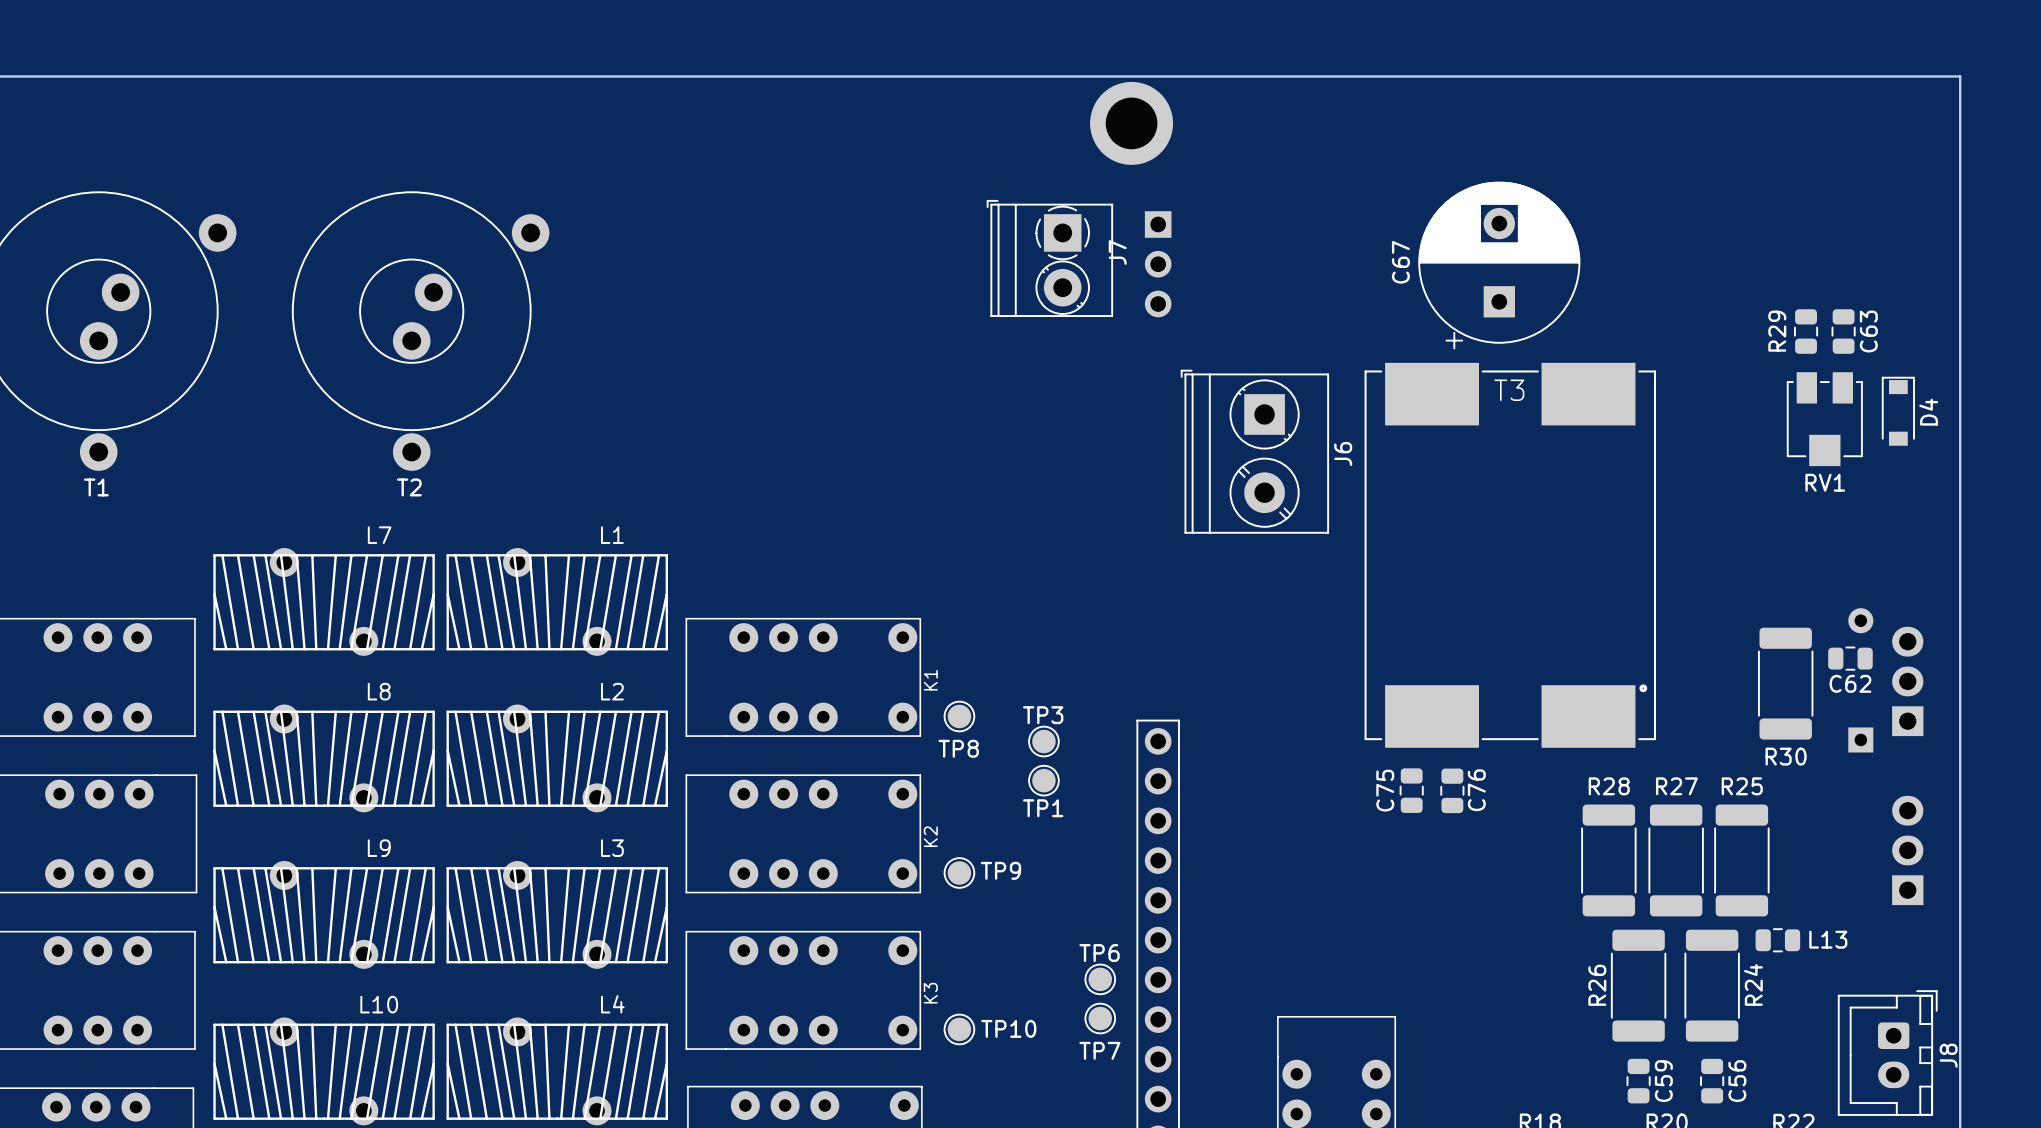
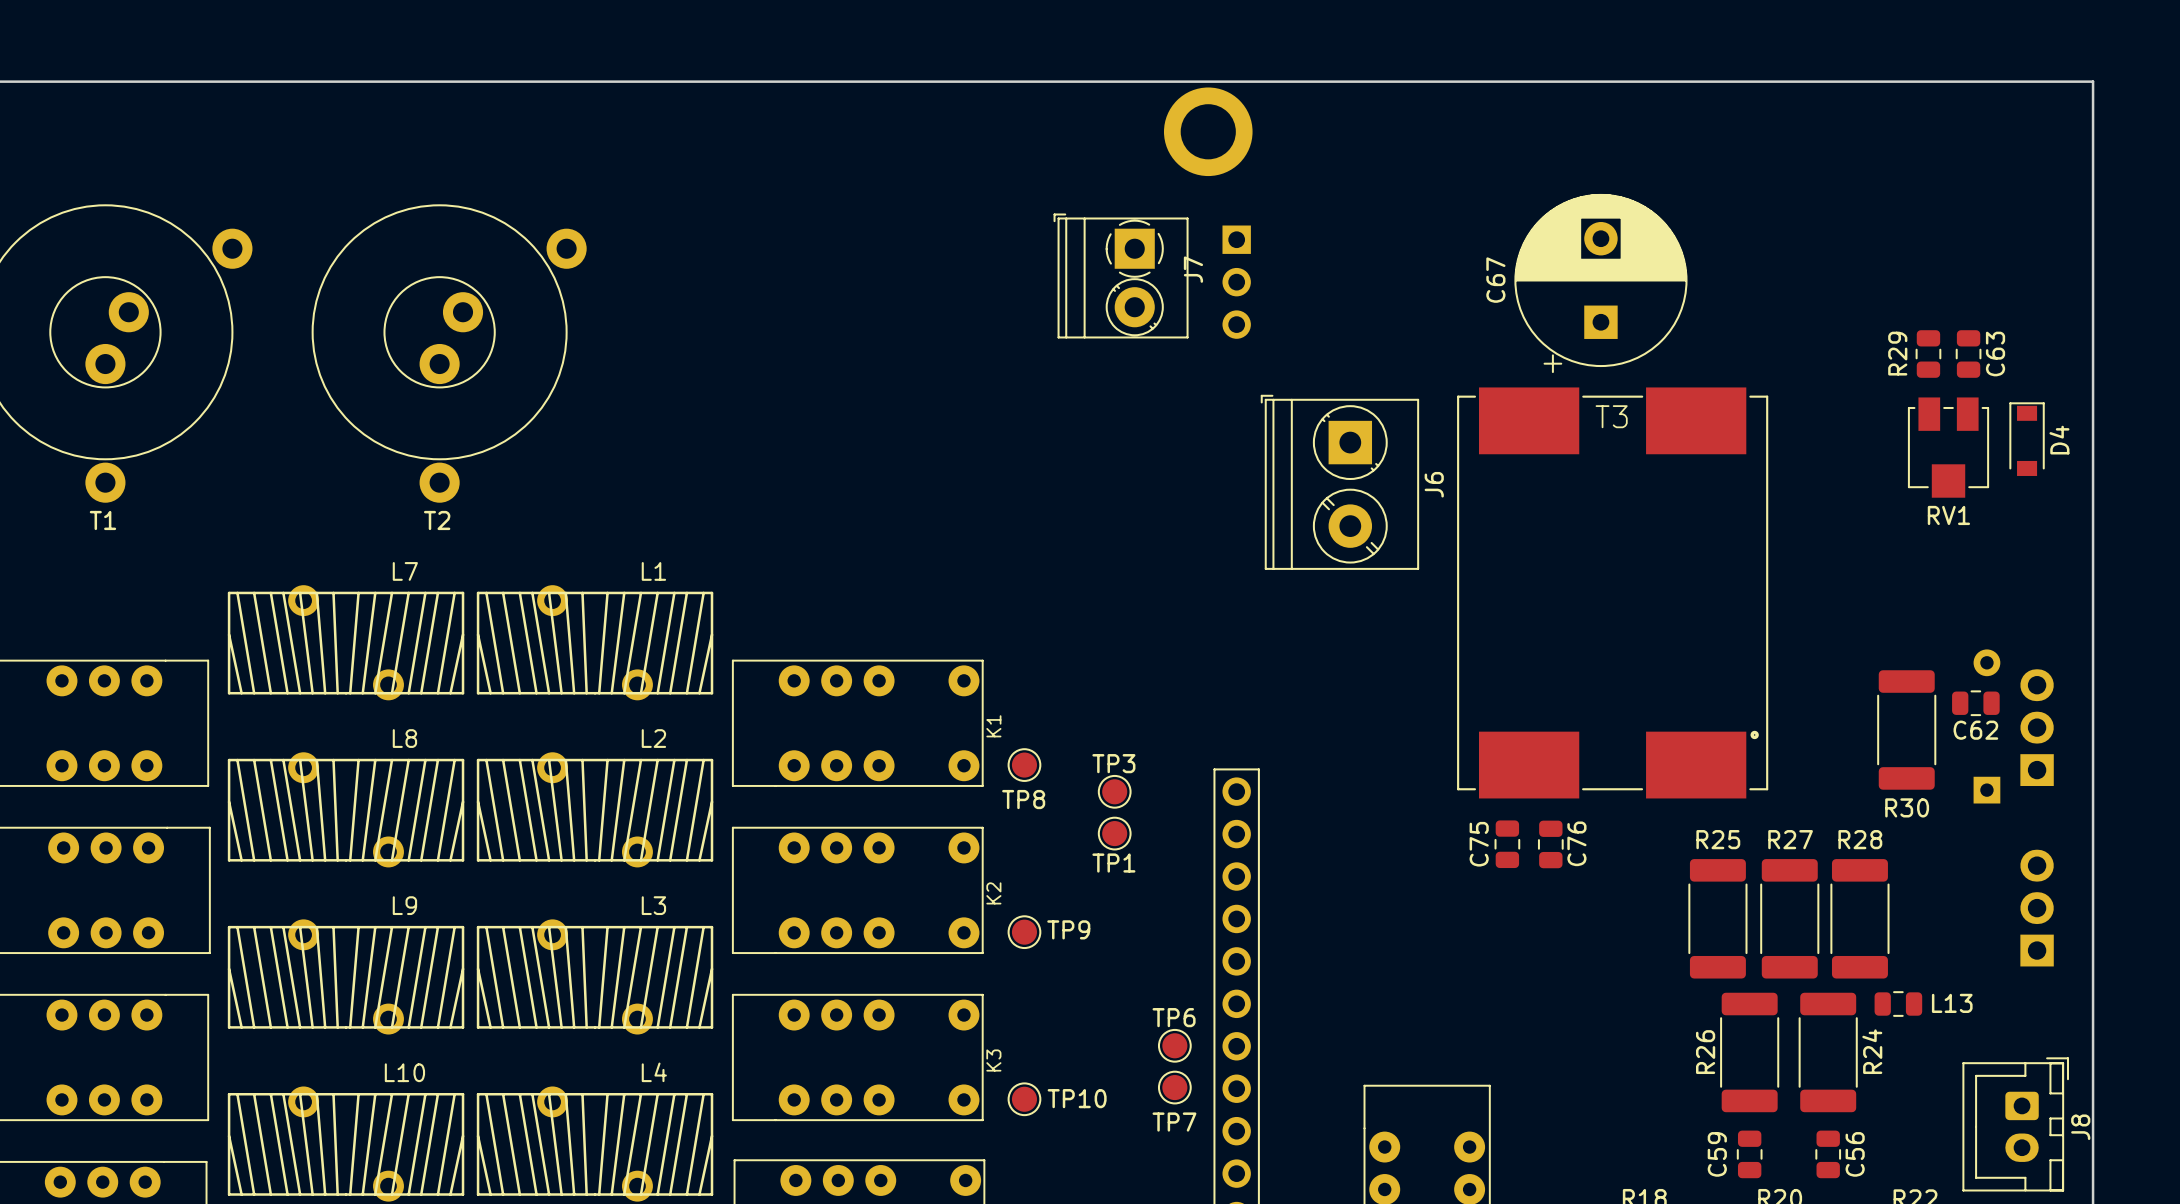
R28 name: R28 (1609, 786) -> R25 (1718, 839)
R25 name: R25 (1742, 786) -> R28 (1860, 839)
C59 name position: C59 (1663, 1081) -> C59 (1717, 1154)

